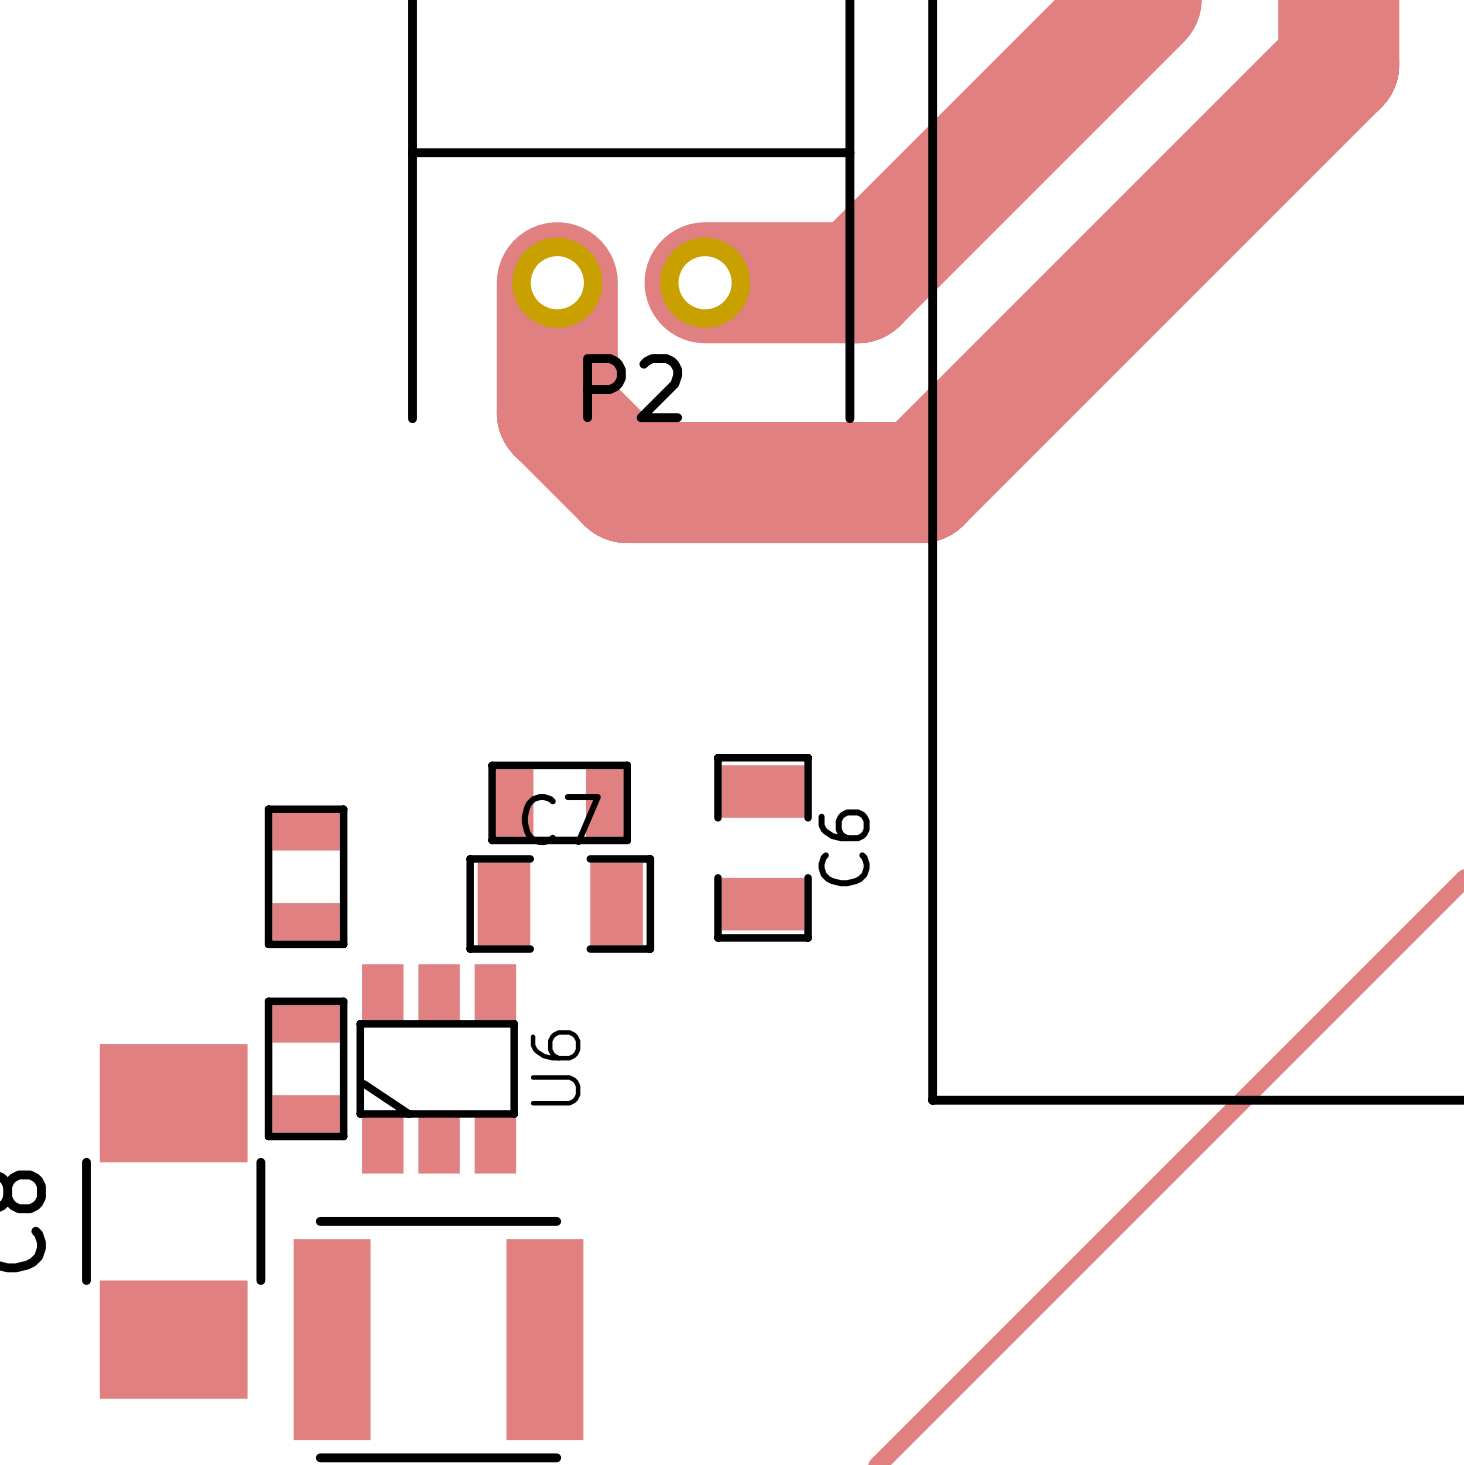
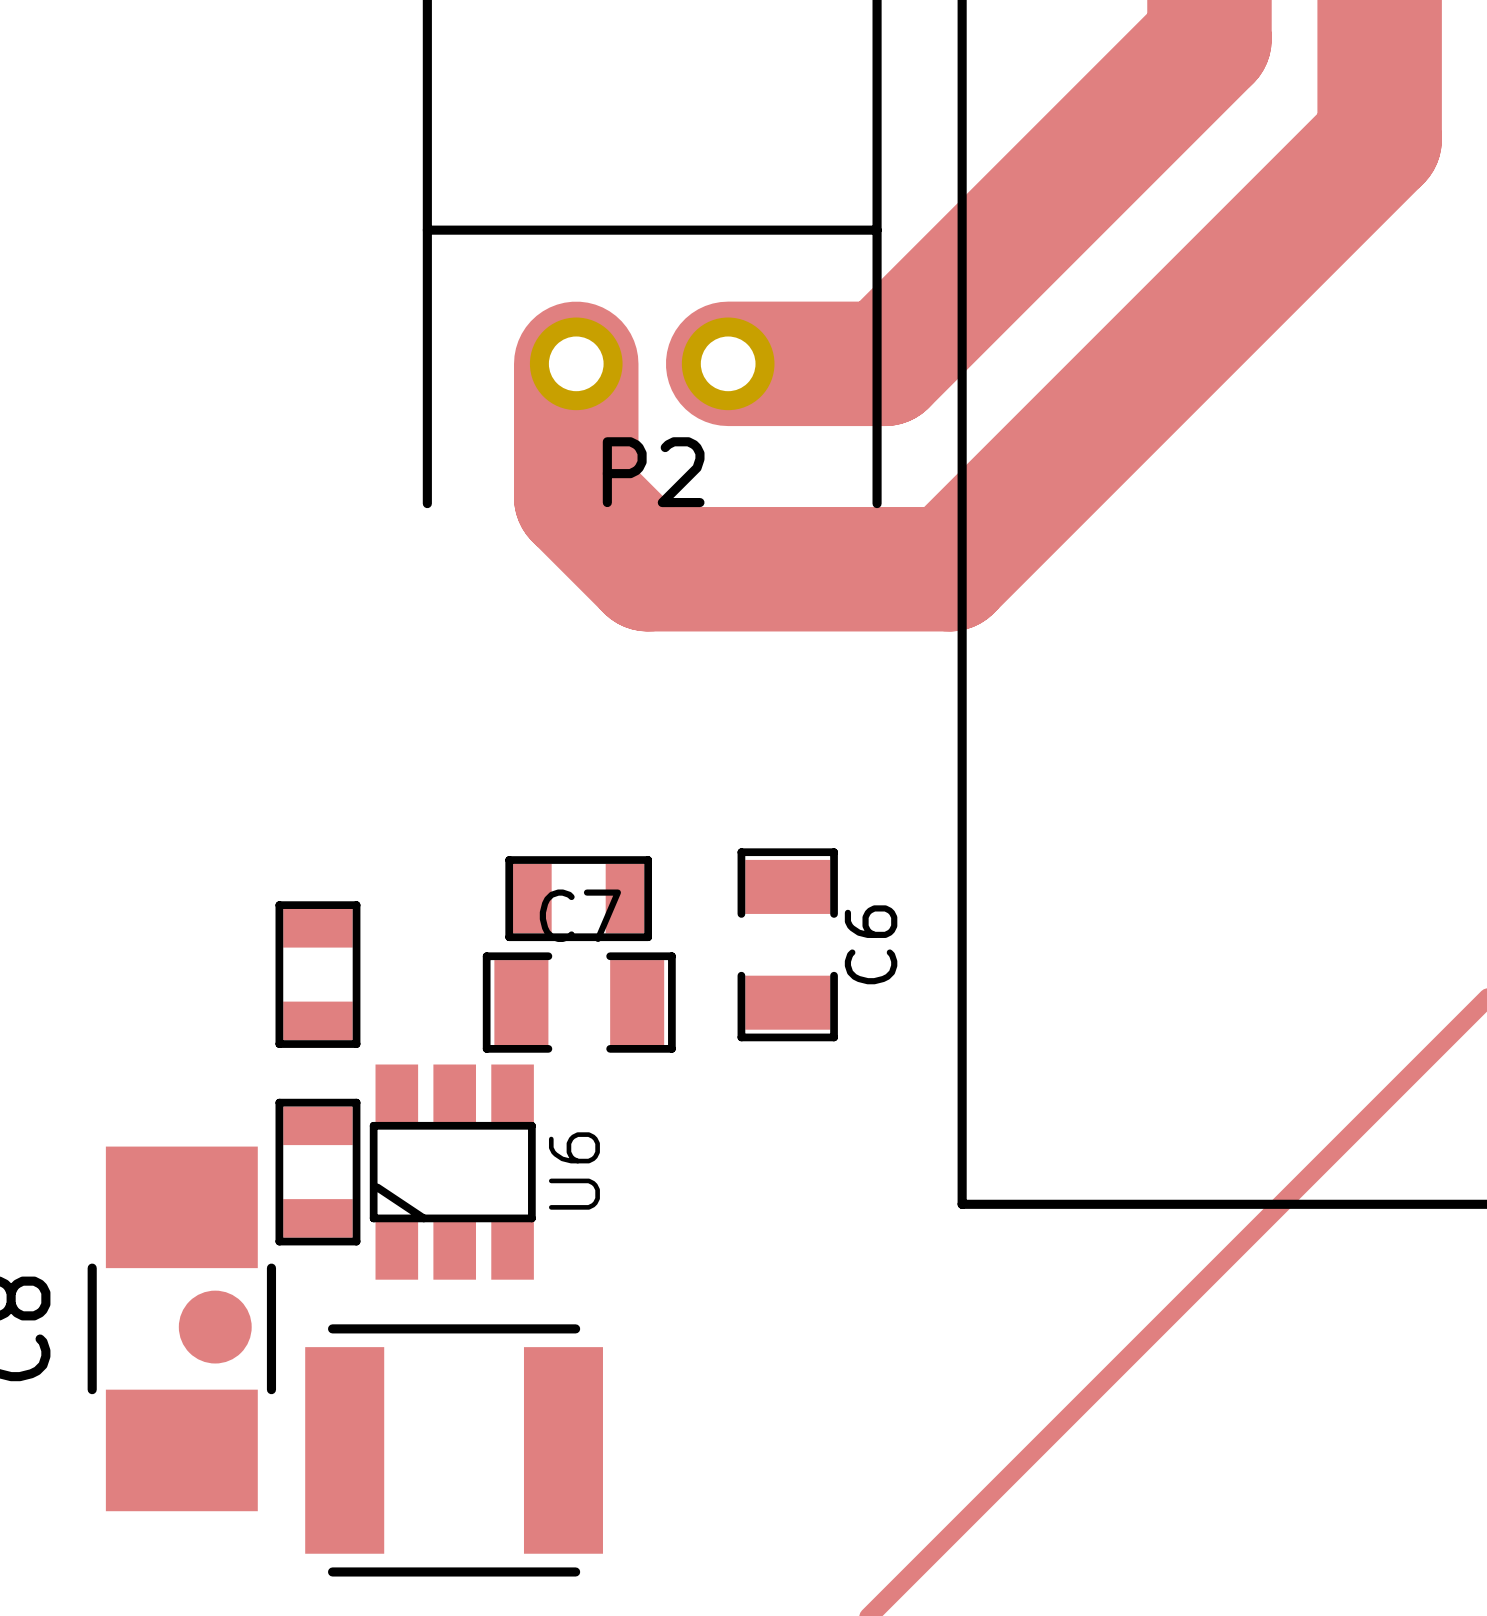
part: none -> (215, 1327)

